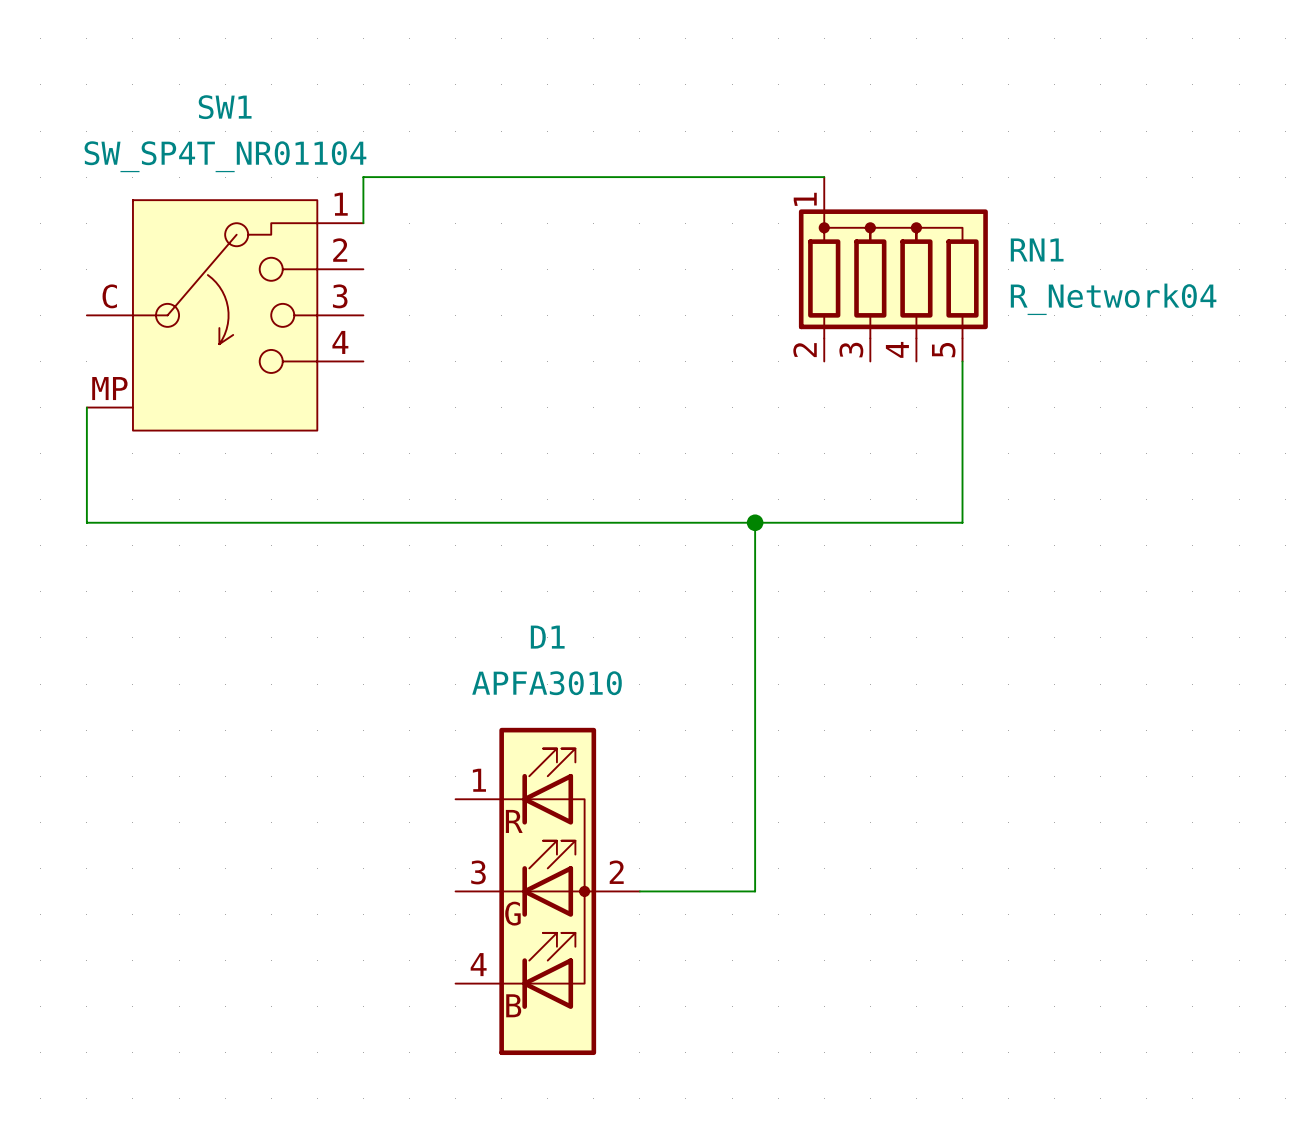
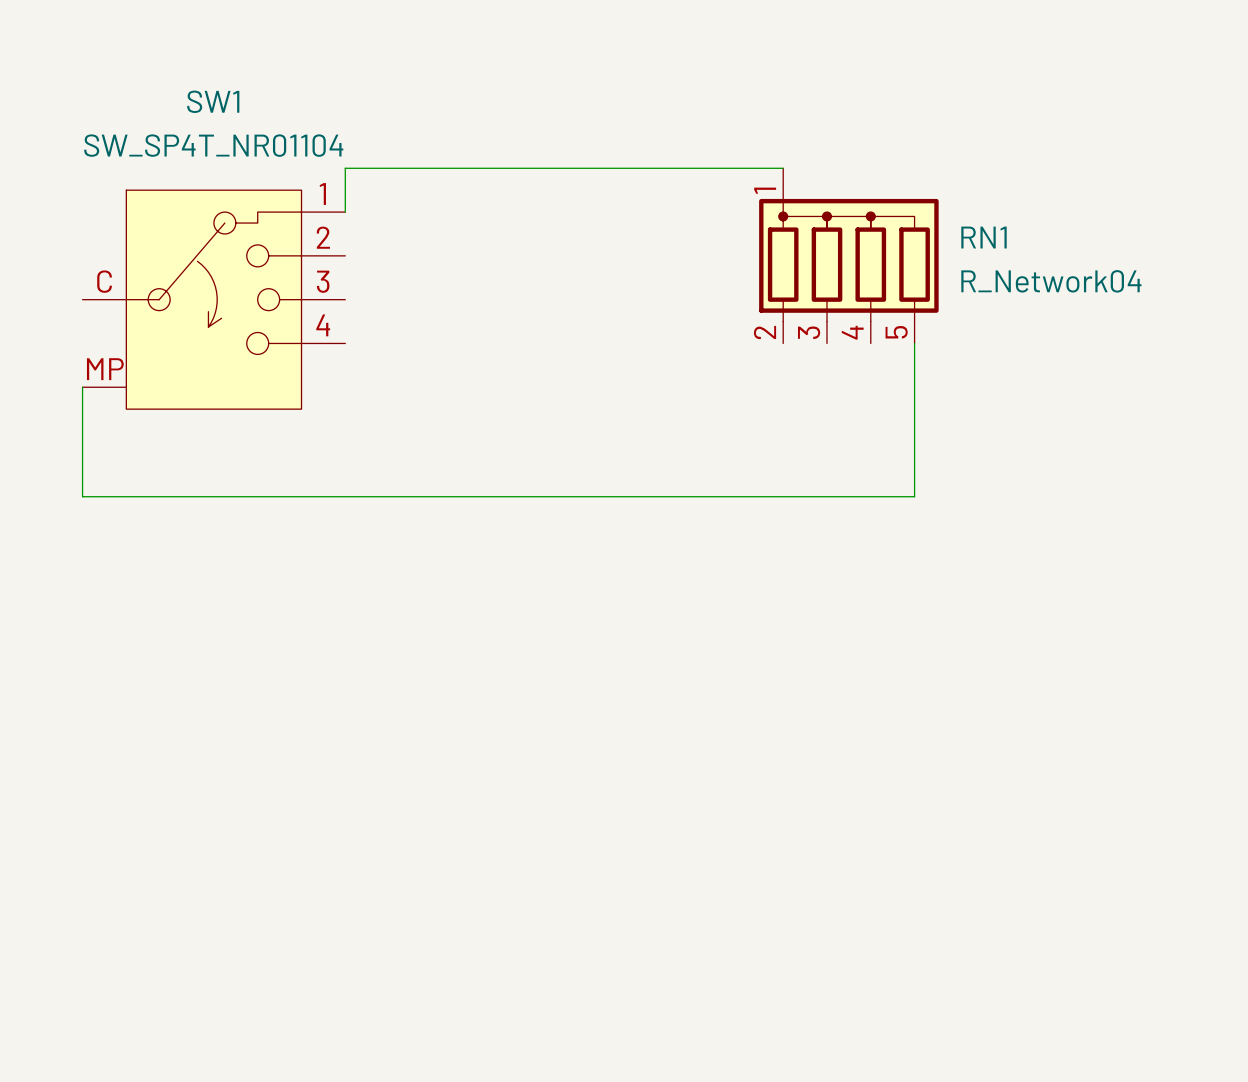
wire: (755, 522) (755, 891) (639, 891) -> none
junction: (755, 522) -> none
D1: APFA3010 (547, 891) -> none

